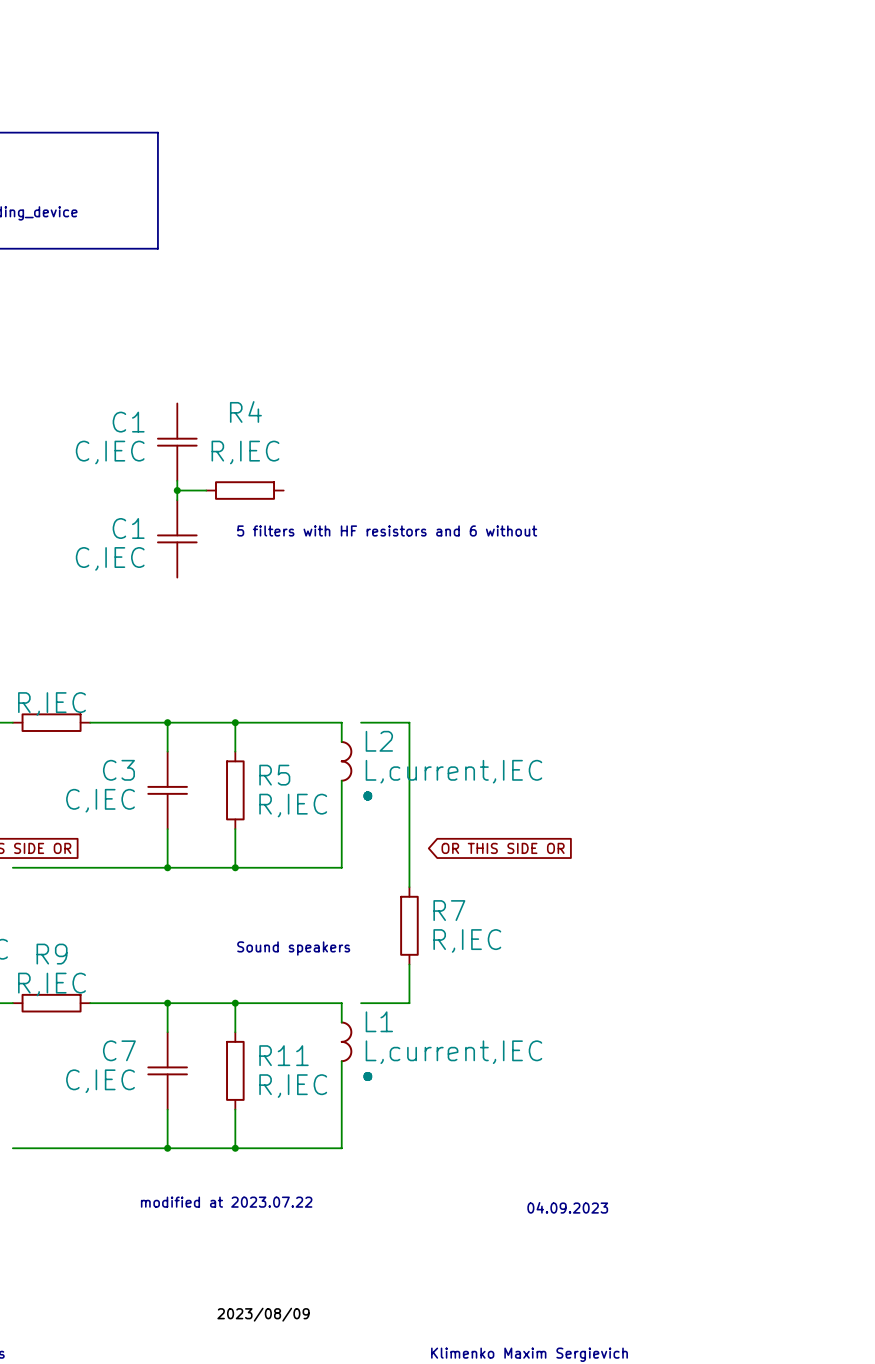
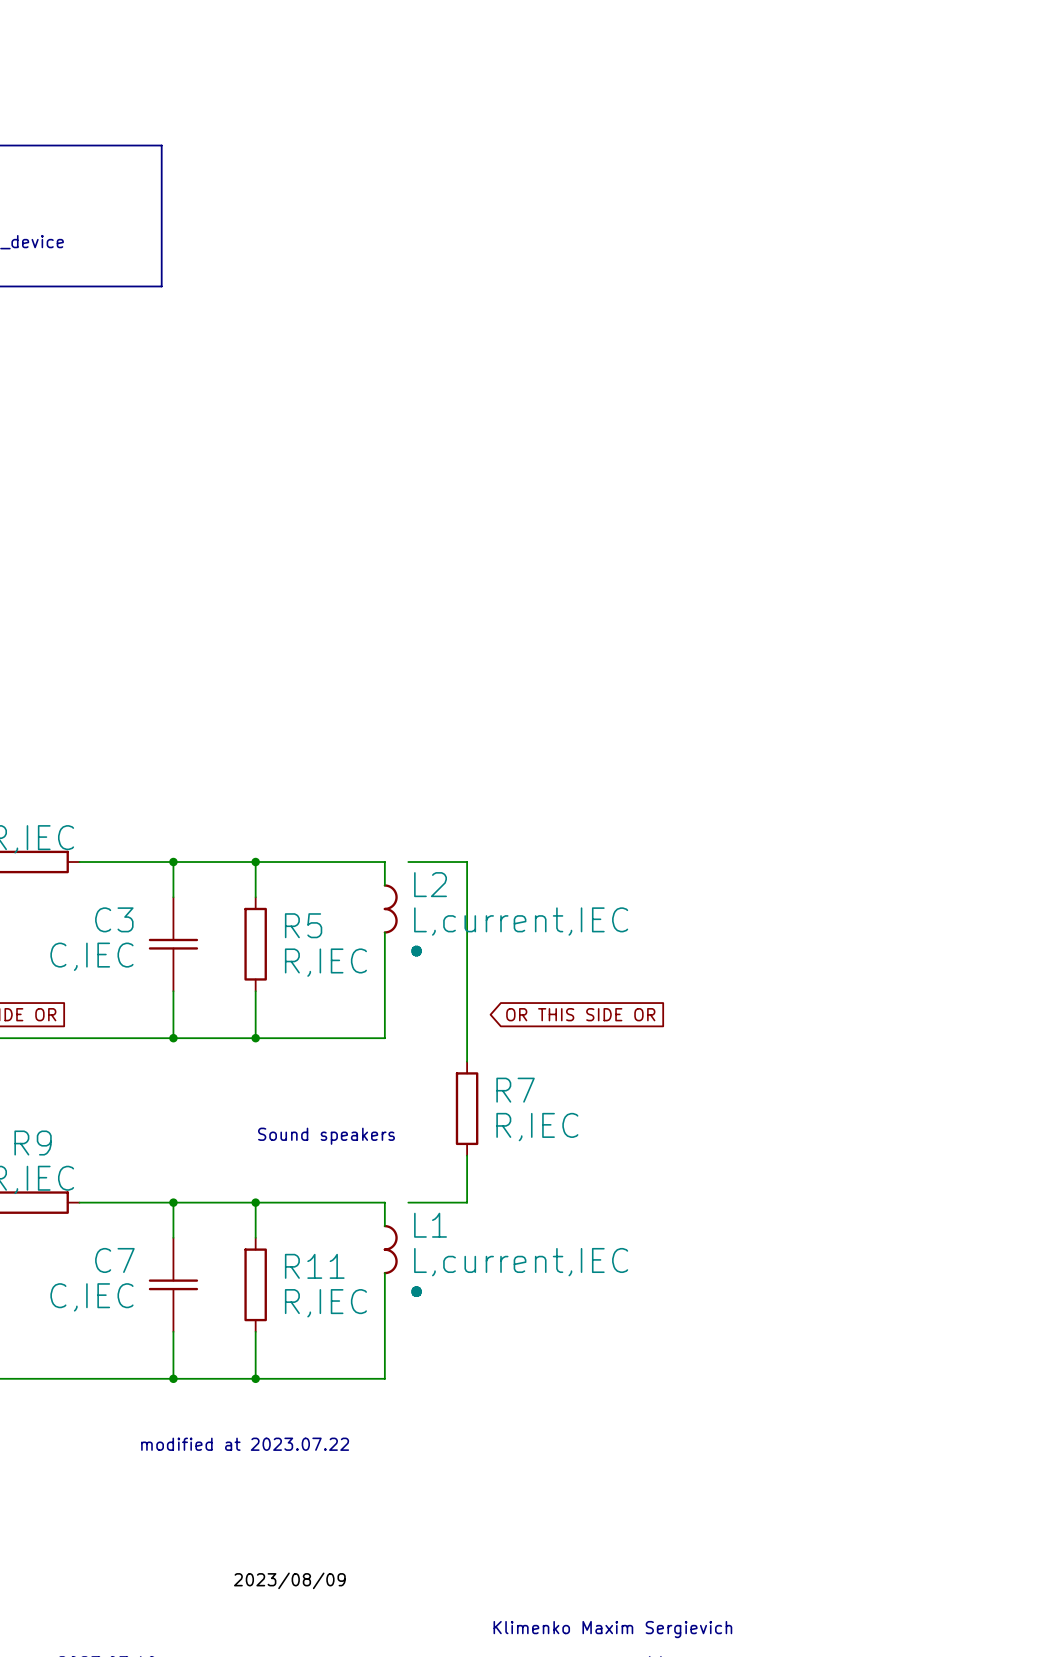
C1: C,IEC (177, 442) -> none
wire: (177, 480) (177, 500) -> none
wire: (177, 490) (206, 490) -> none
junction: (177, 490) -> none
R4: R,IEC (245, 490) -> none
text: 5 filters with HF resistors and 6 without (387, 530) -> none
C1: C,IEC (177, 538) -> none
text: 04.09.2023 (567, 1207) -> none

